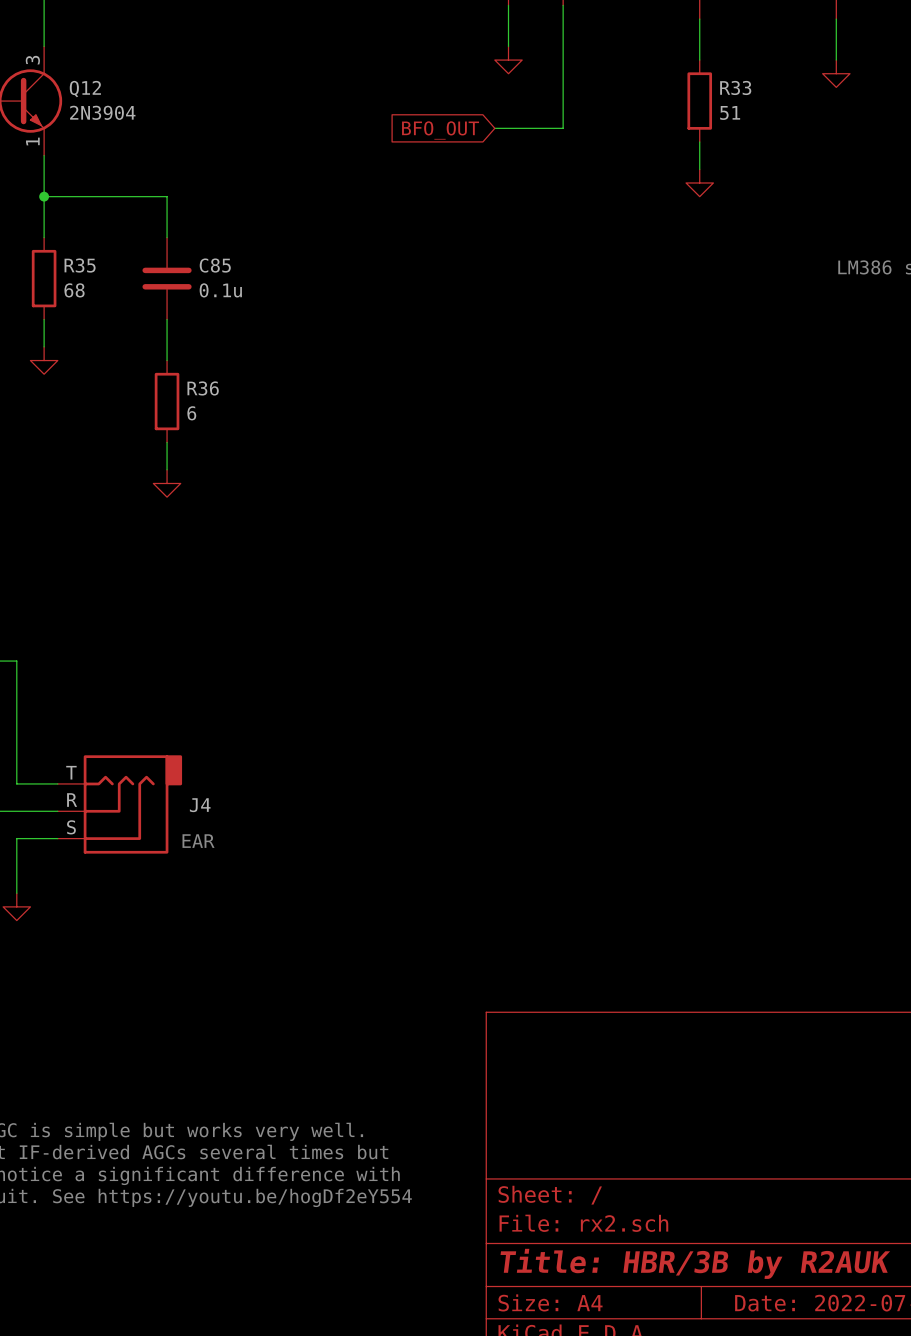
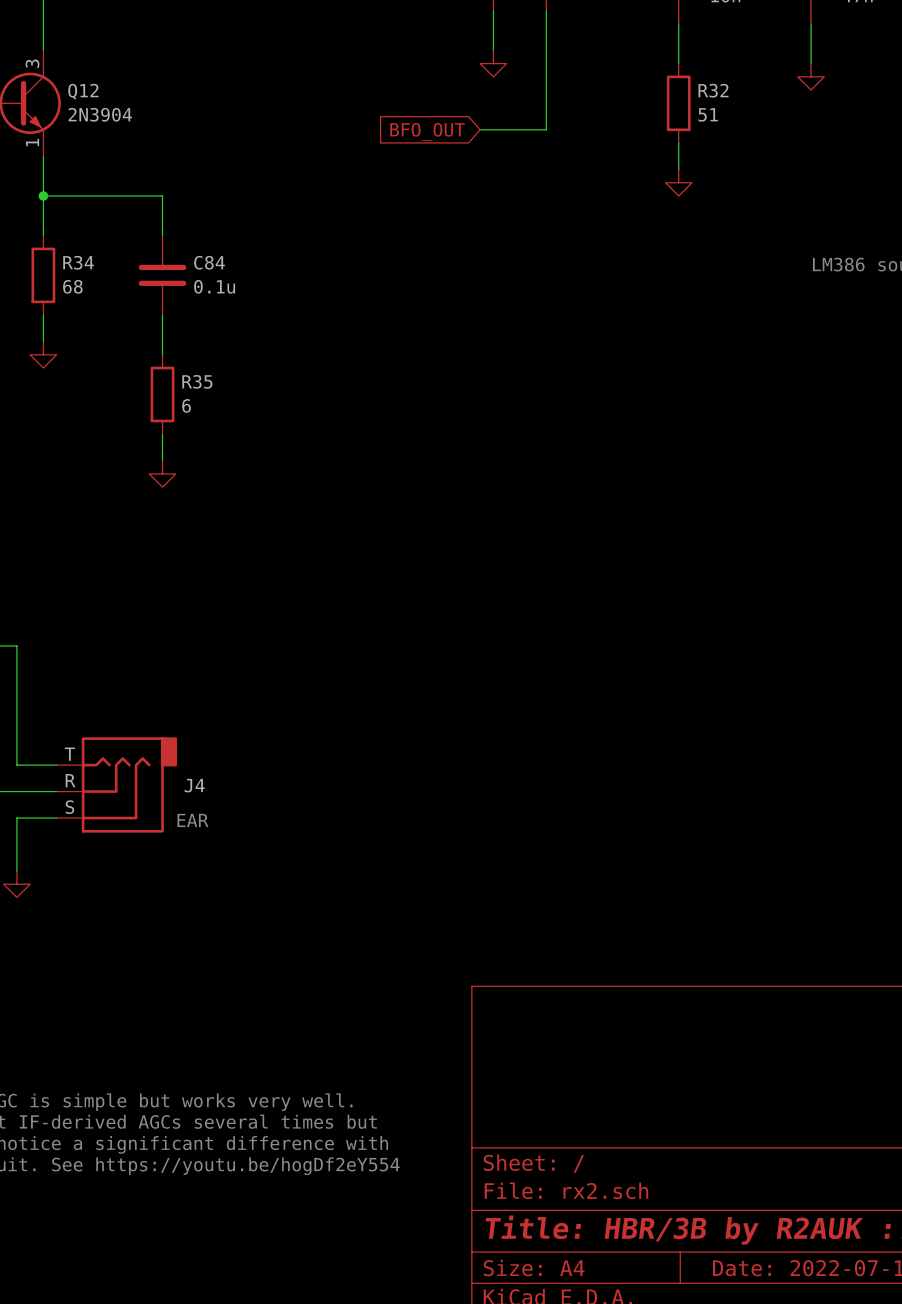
R33 name: R33 (735, 87) -> R32 (713, 90)
R35 name: R35 (80, 265) -> R34 (78, 262)
C85 name: C85 (215, 265) -> C84 (209, 262)
R36 name: R36 (203, 388) -> R35 (197, 381)

